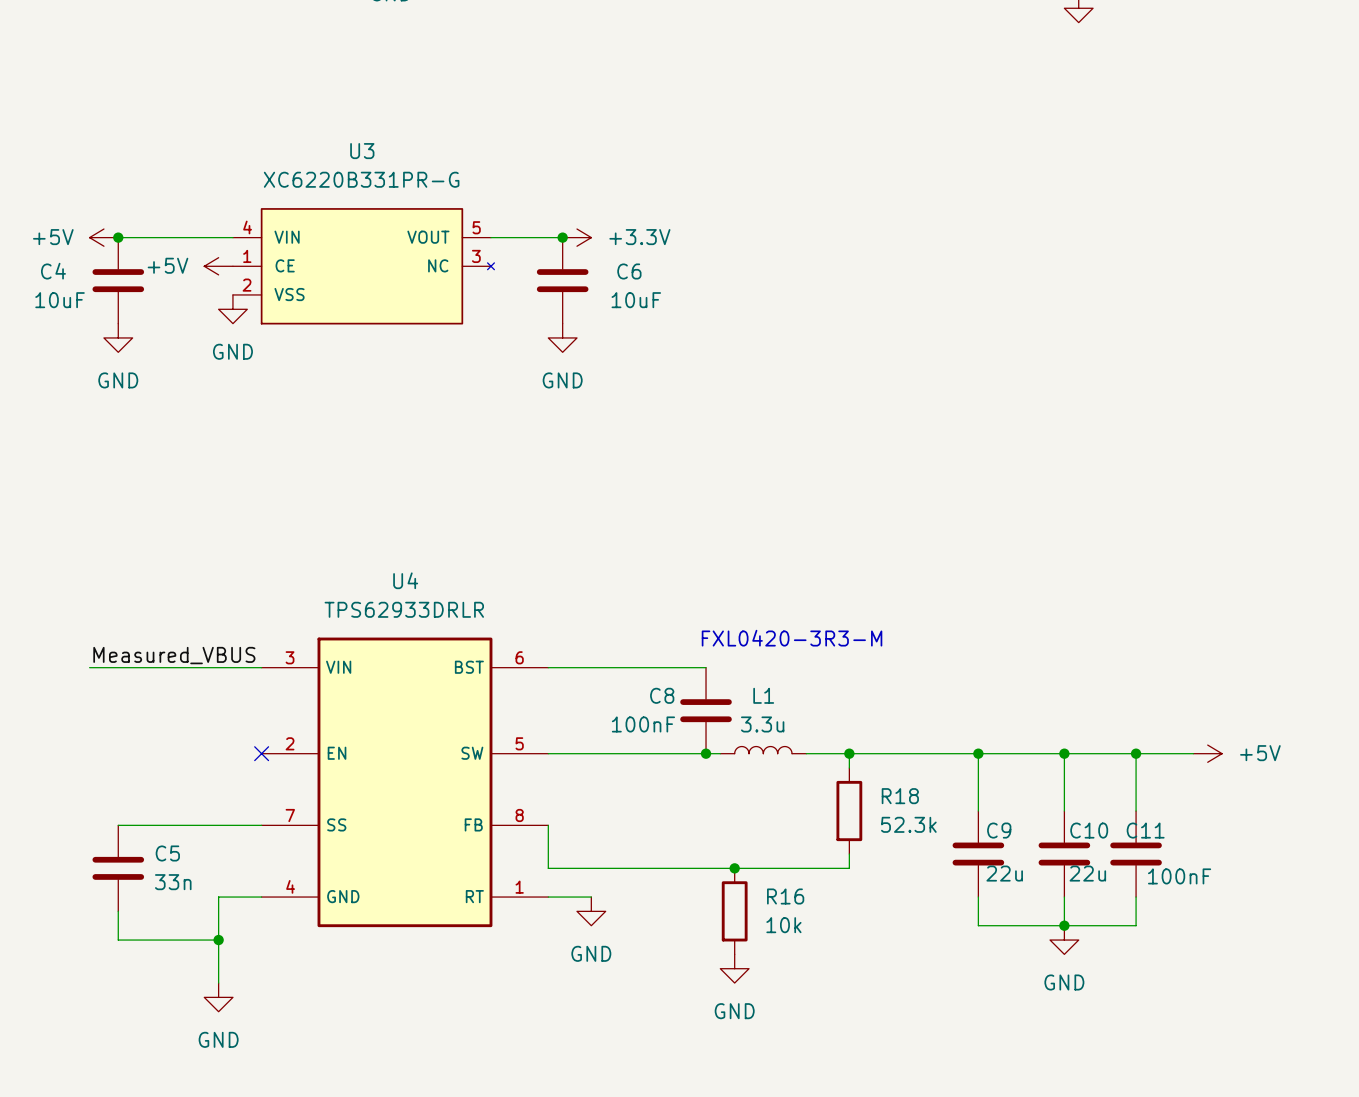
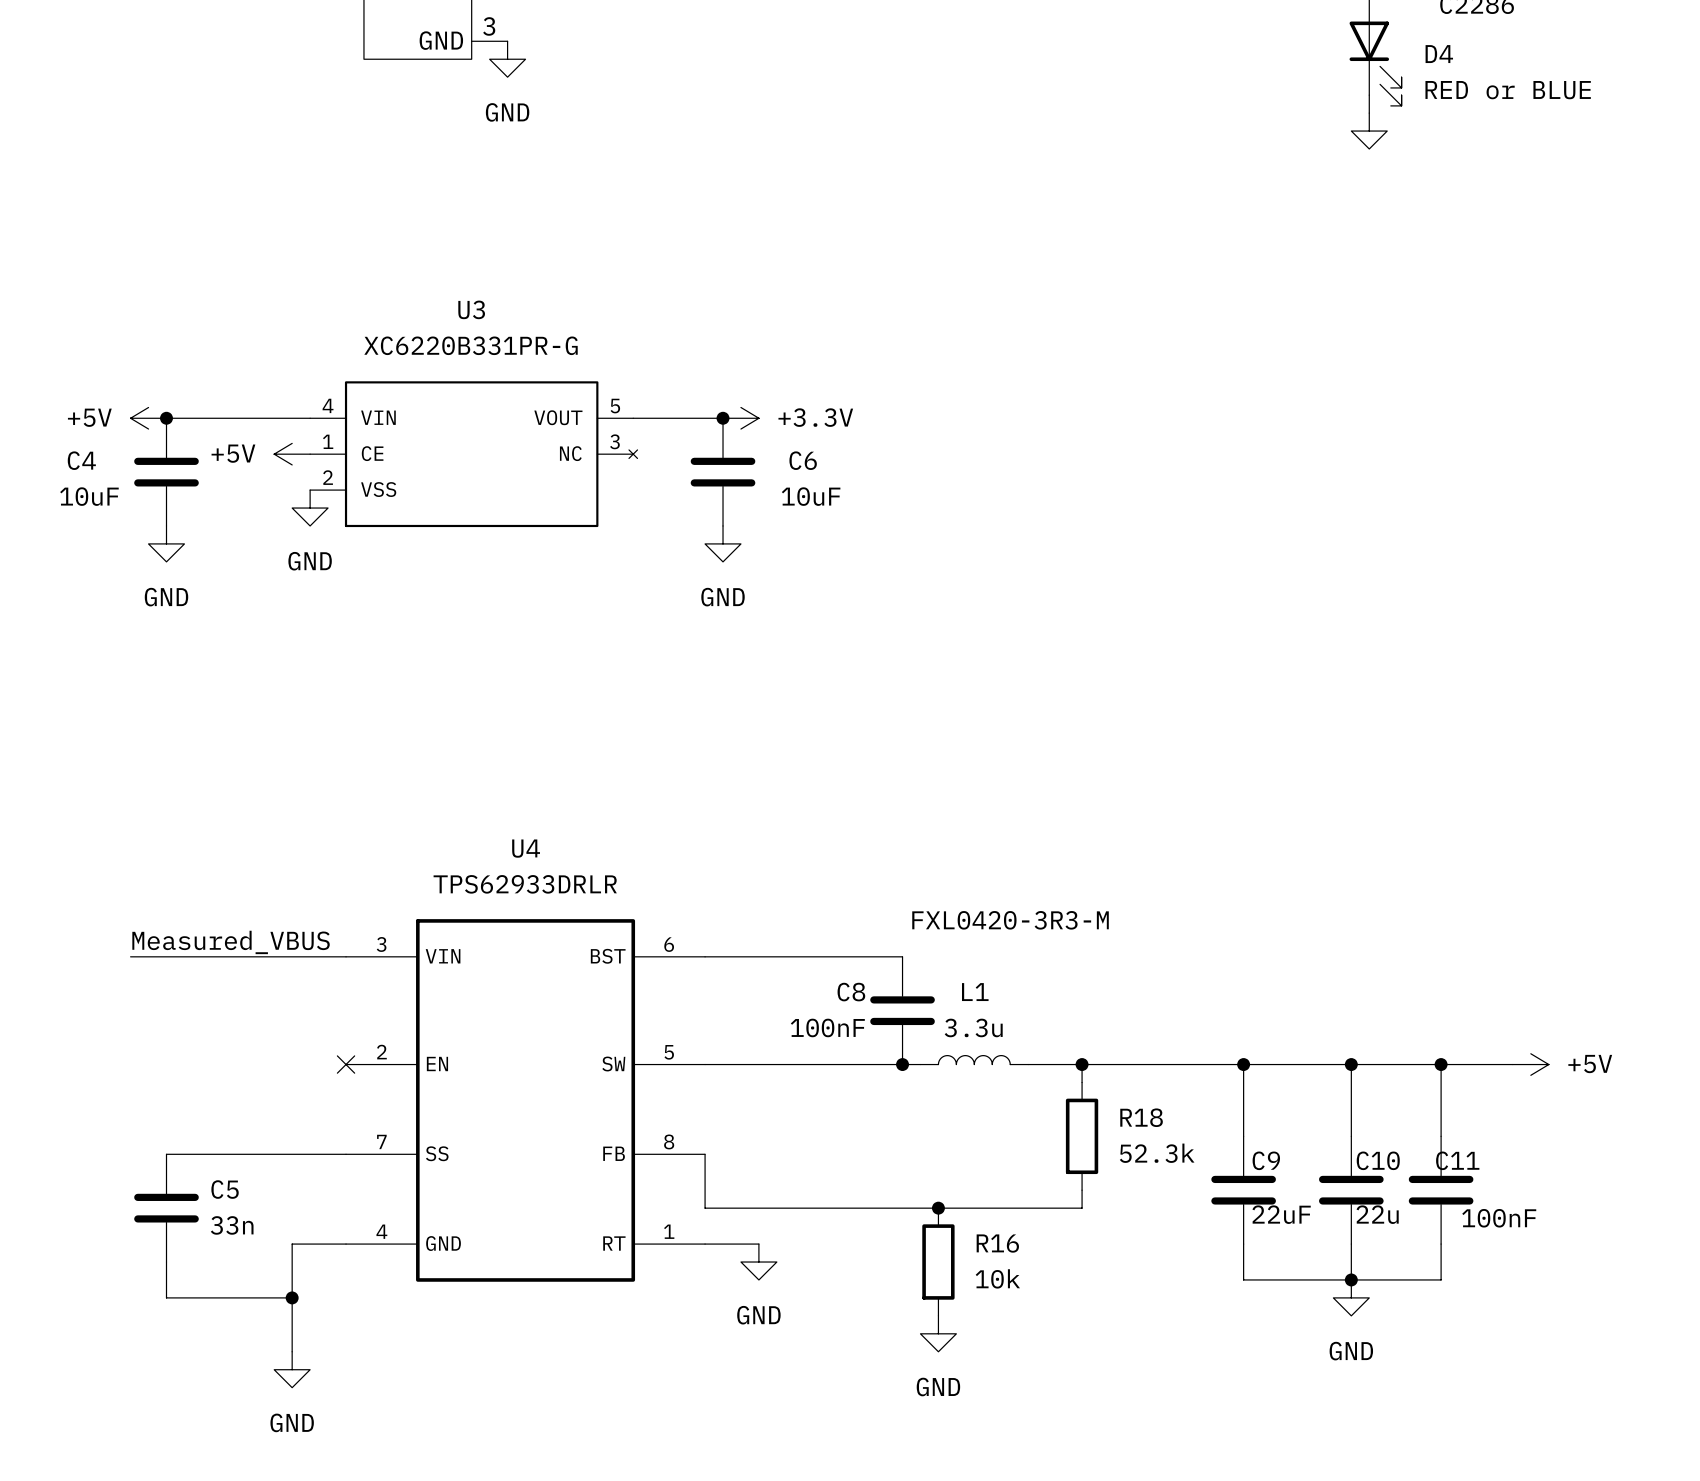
C9 value: 22u (1004, 873) -> 22uF (1281, 1214)

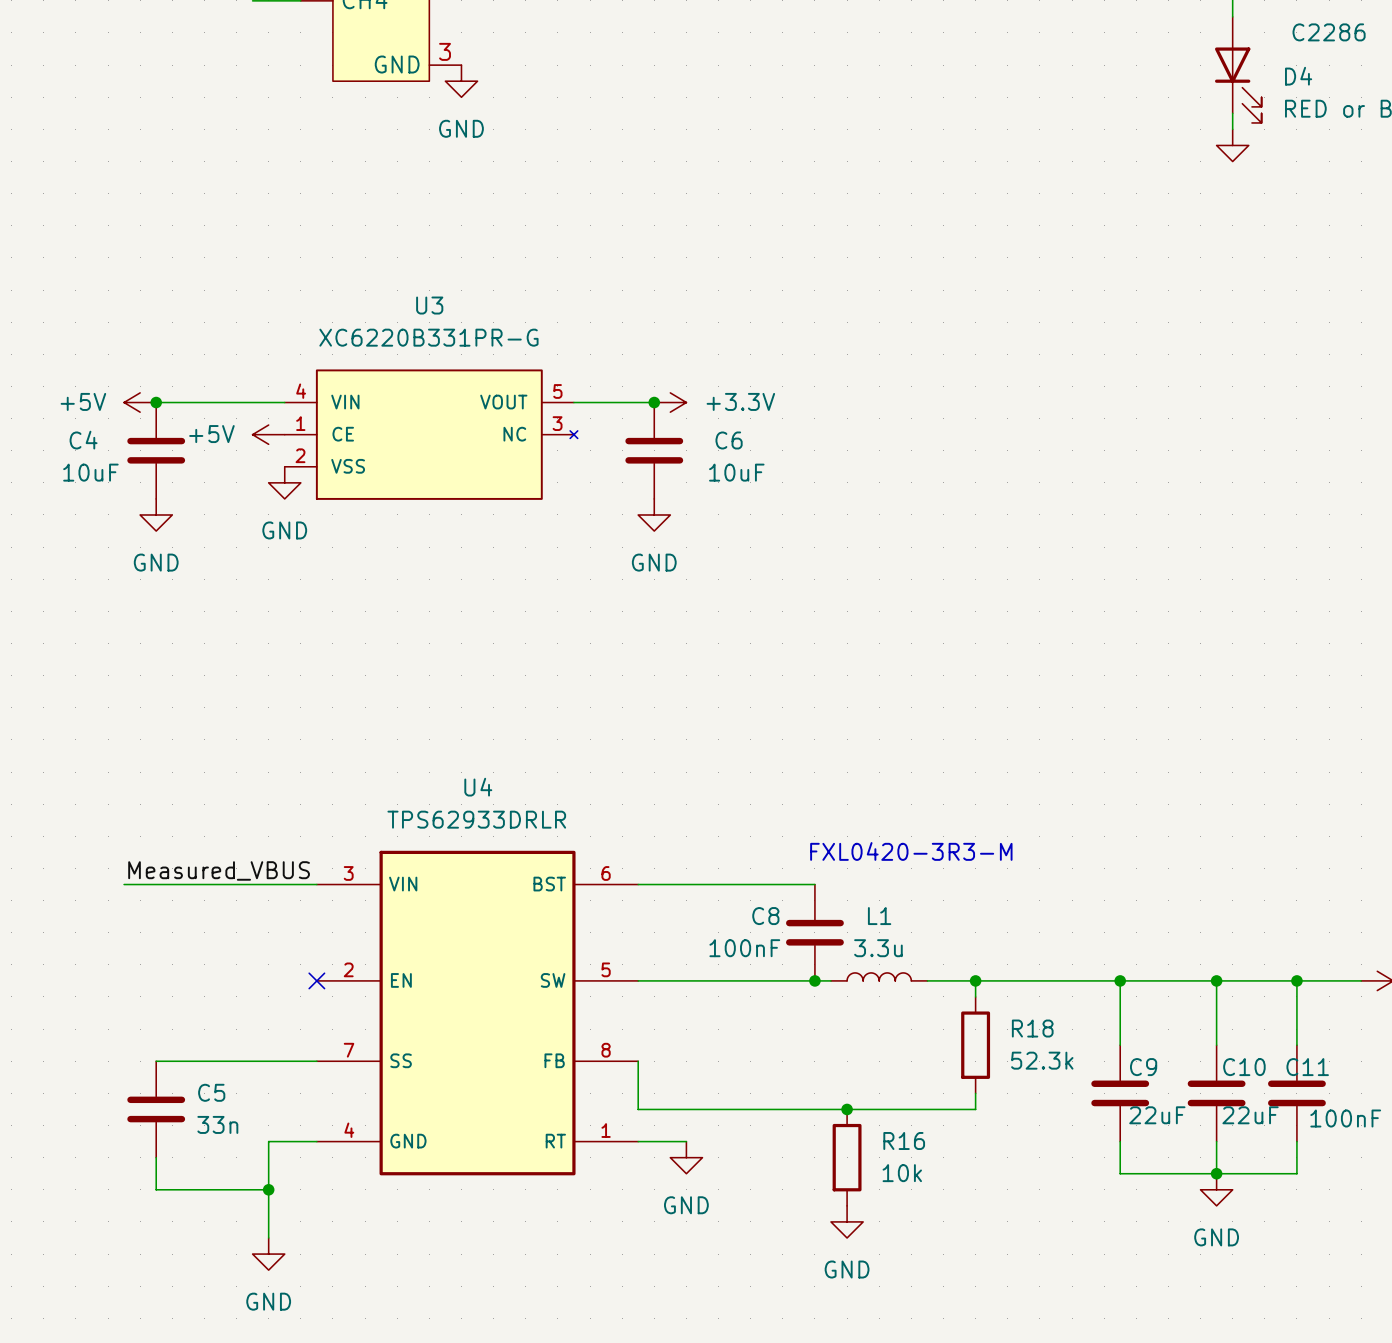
C10 value: 22u (1377, 1214) -> 22uF (1250, 1115)

